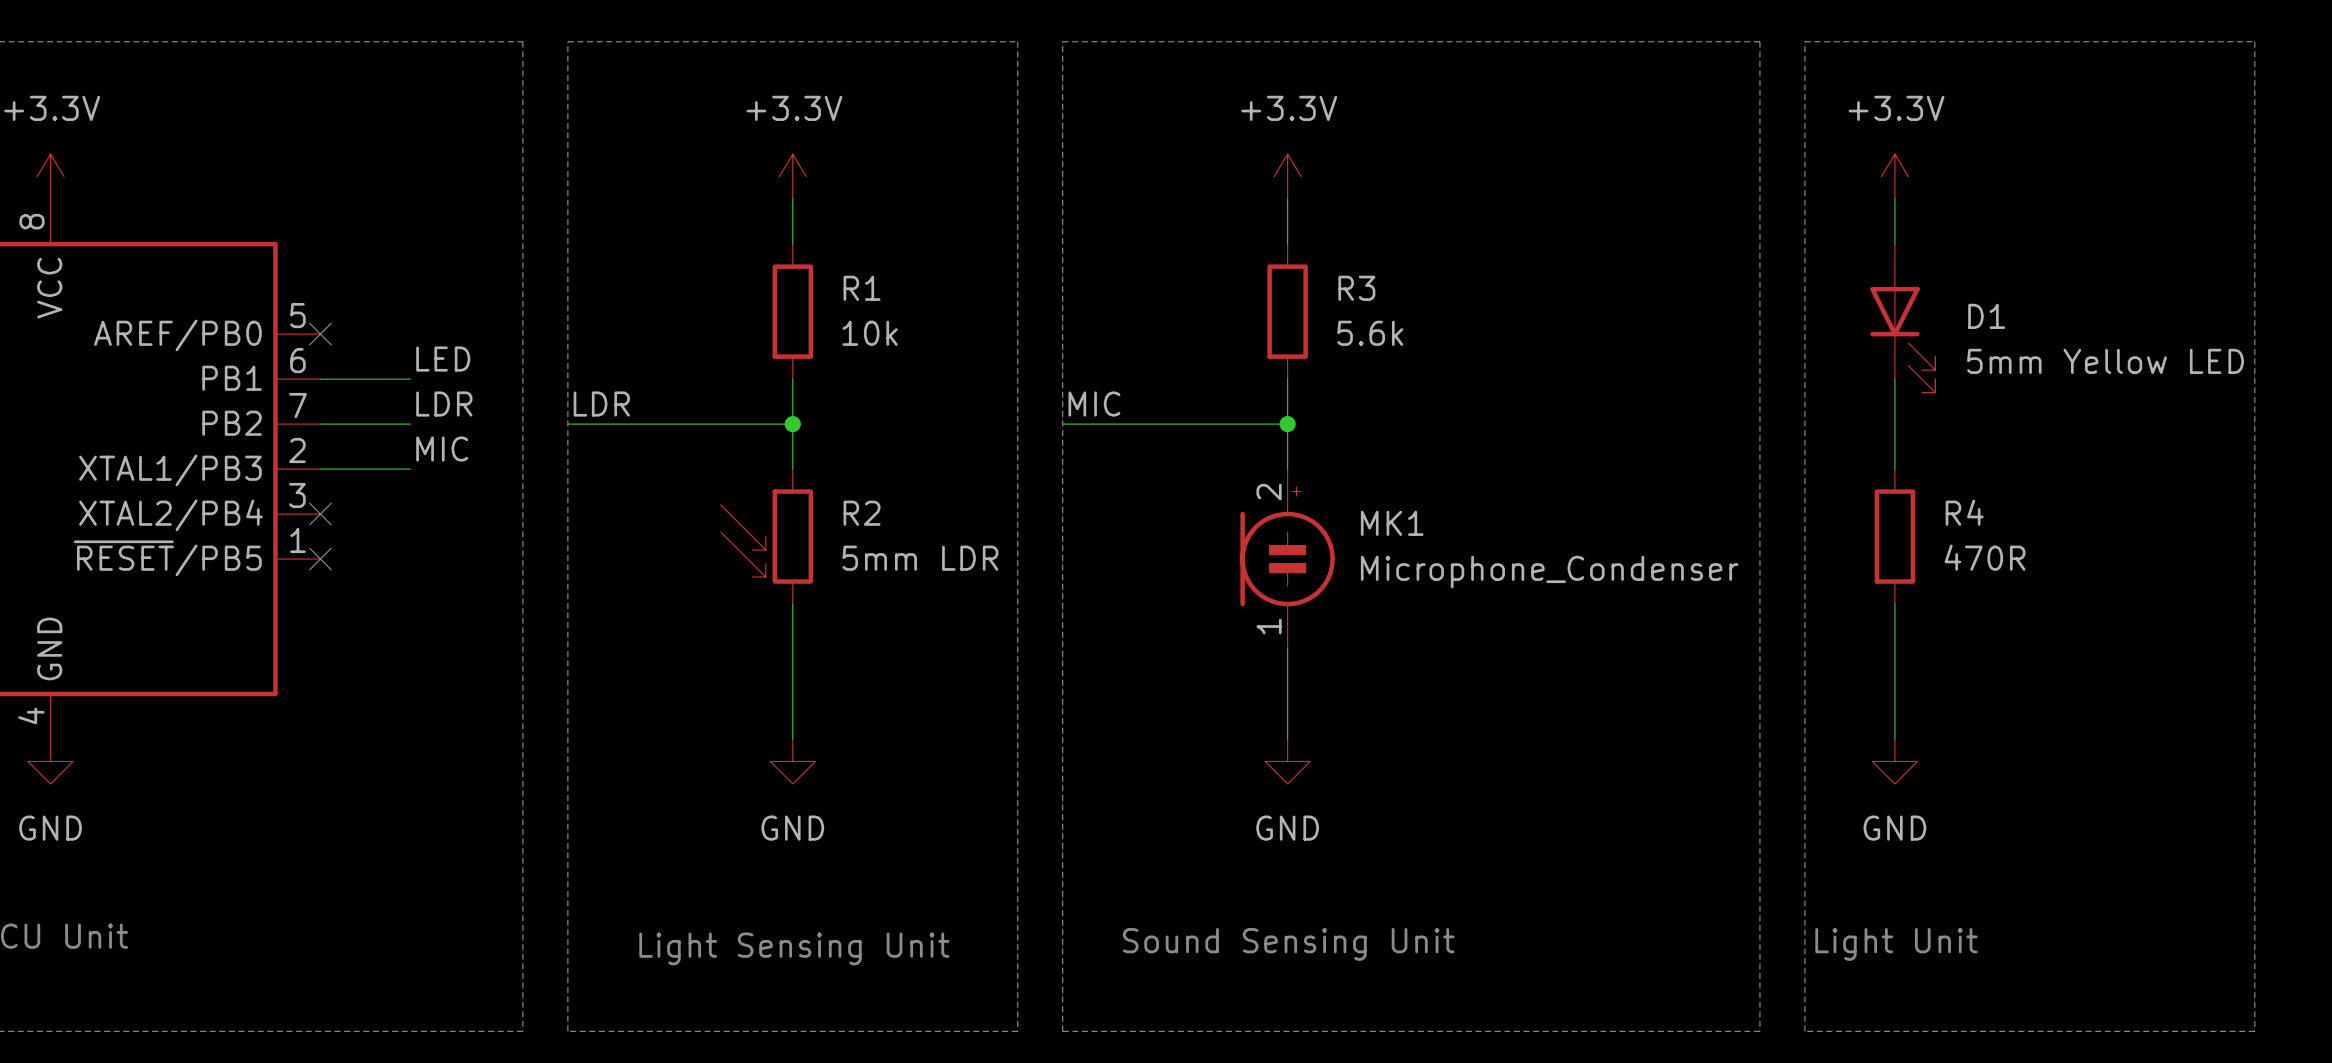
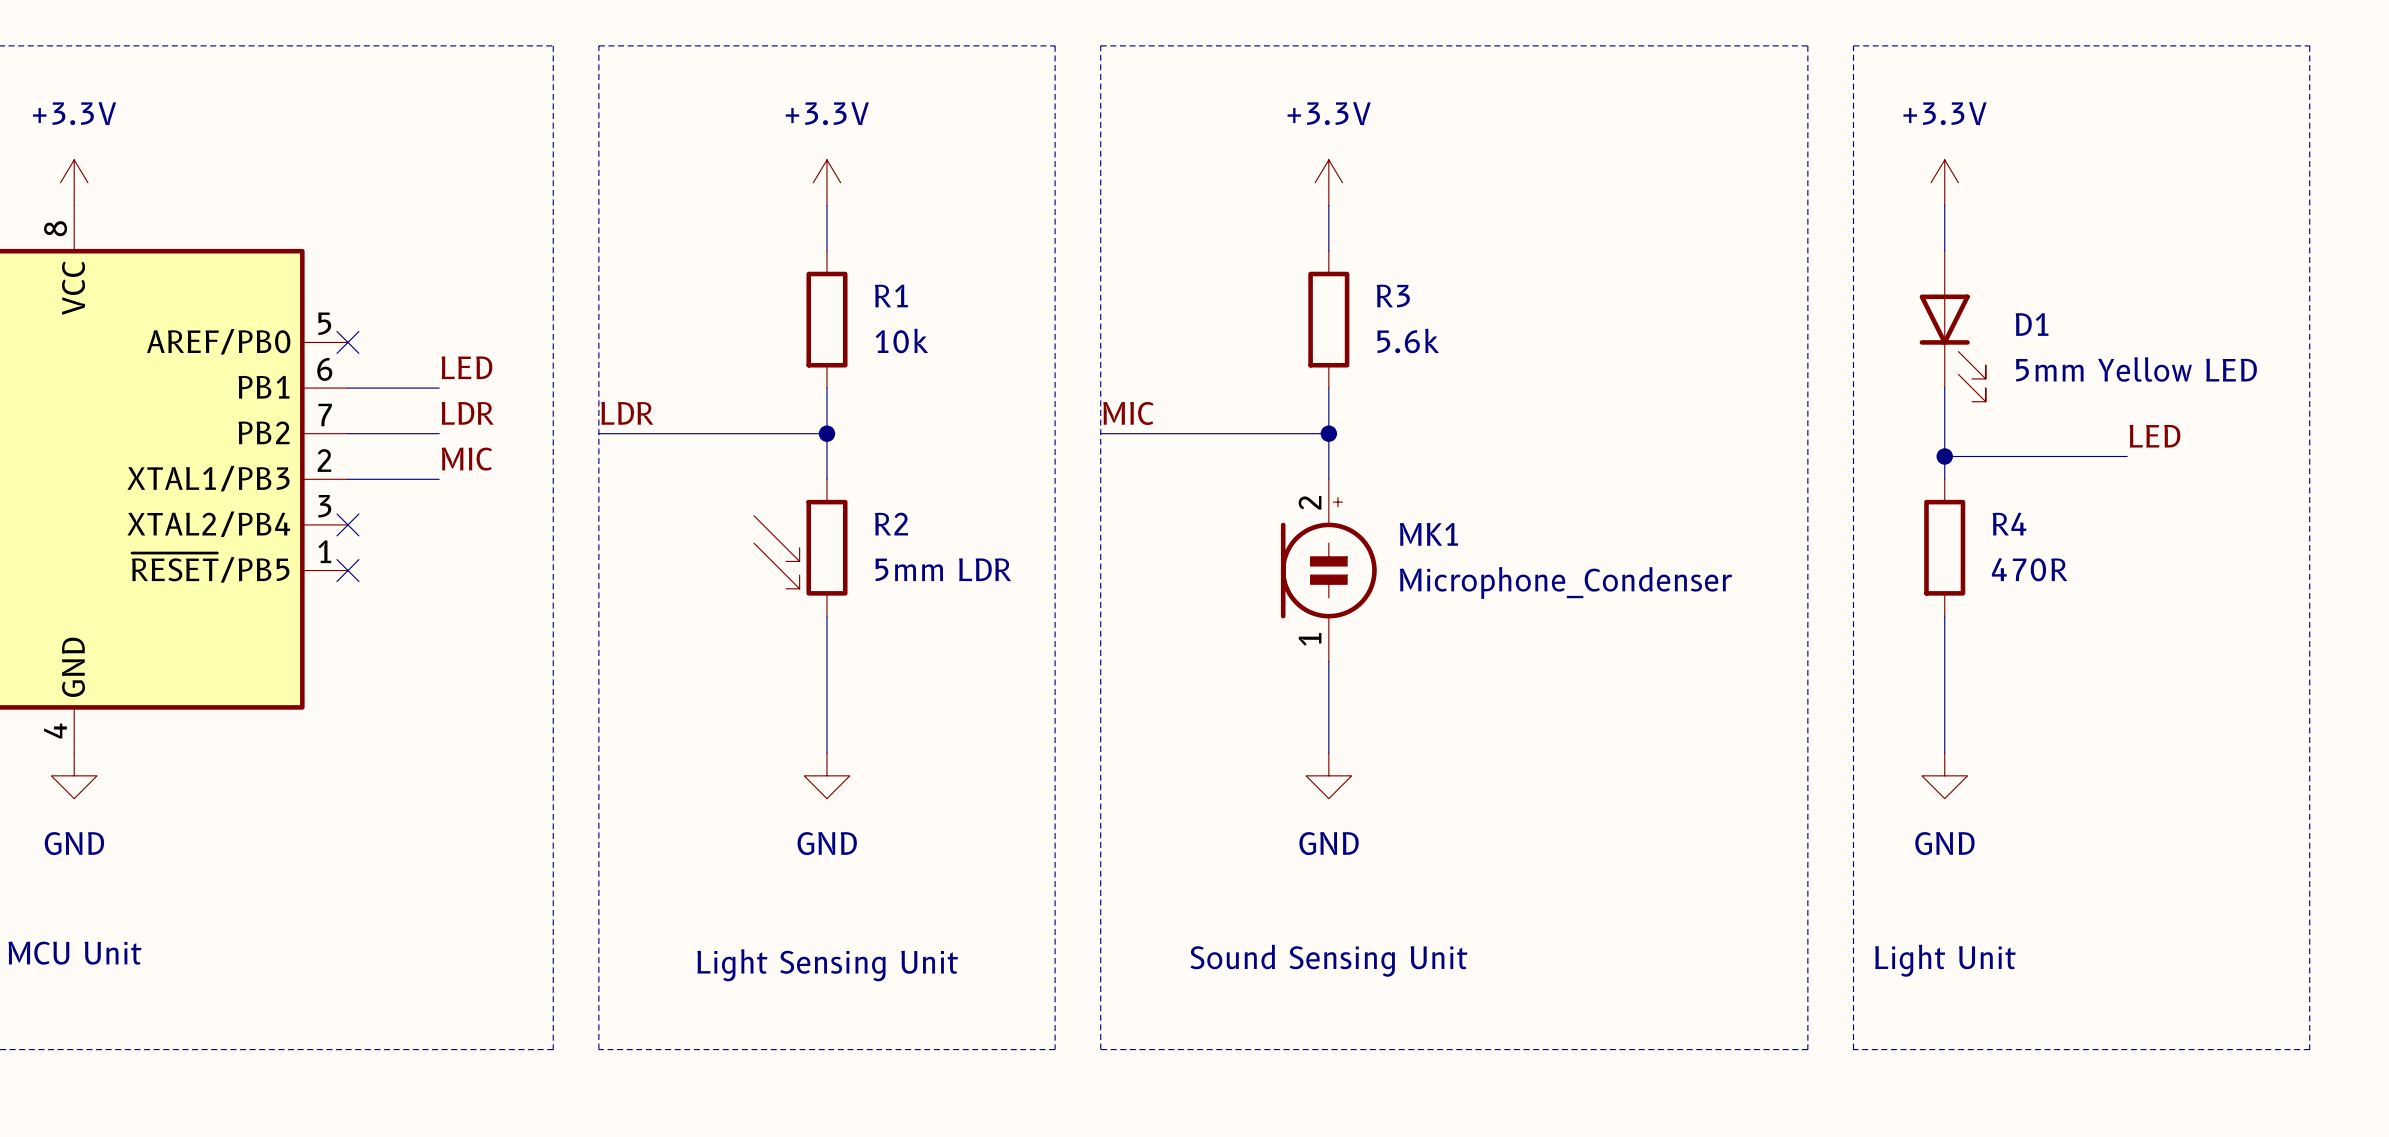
label: none -> LED (2154, 436)
wire: none -> (1944, 456) (2127, 456)
junction: none -> (1944, 456)

